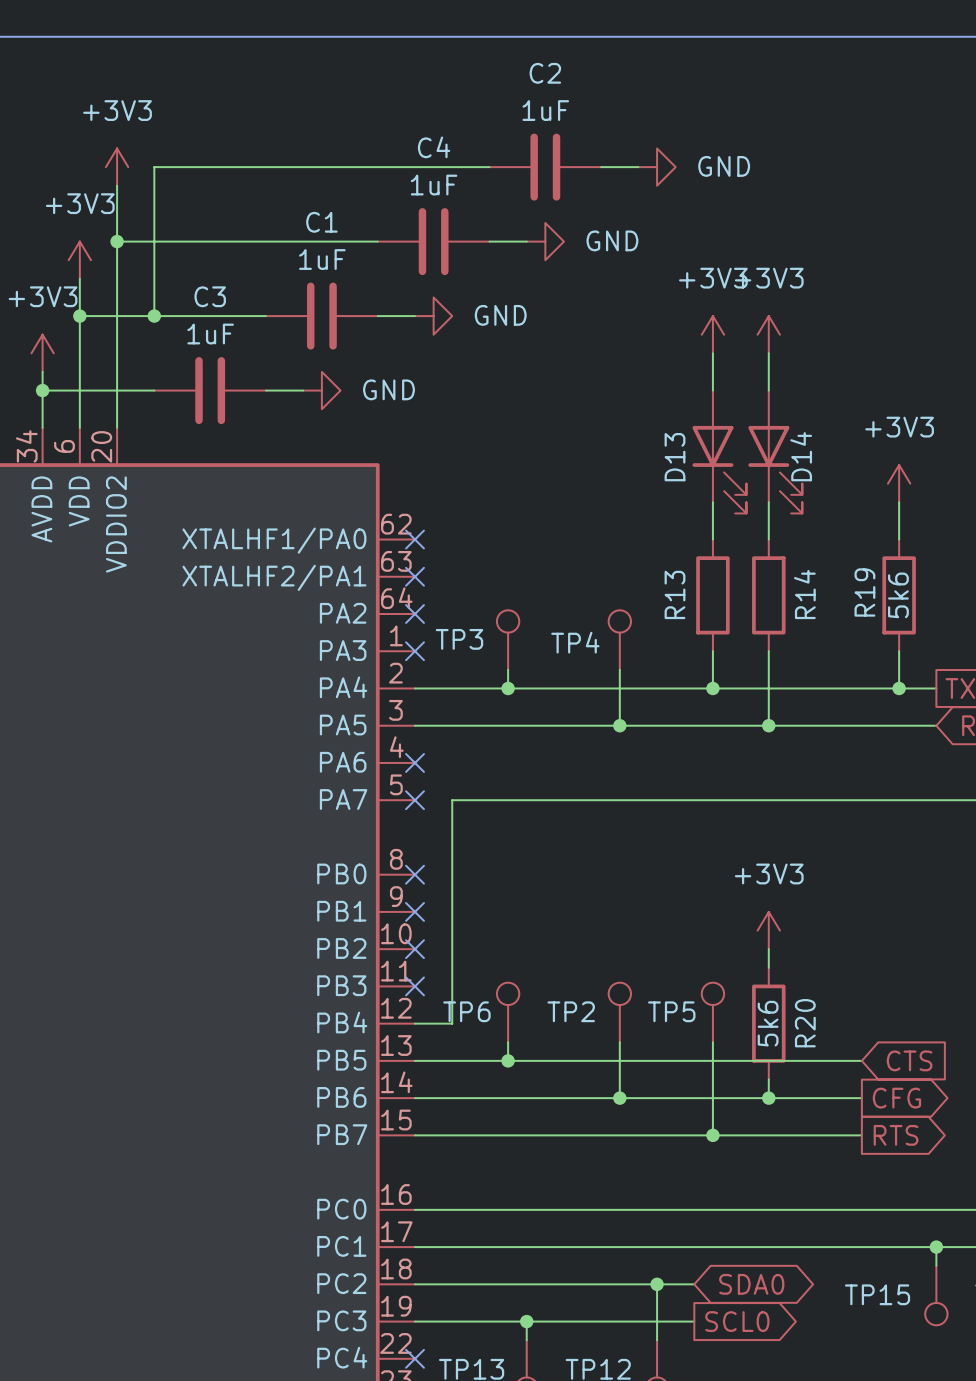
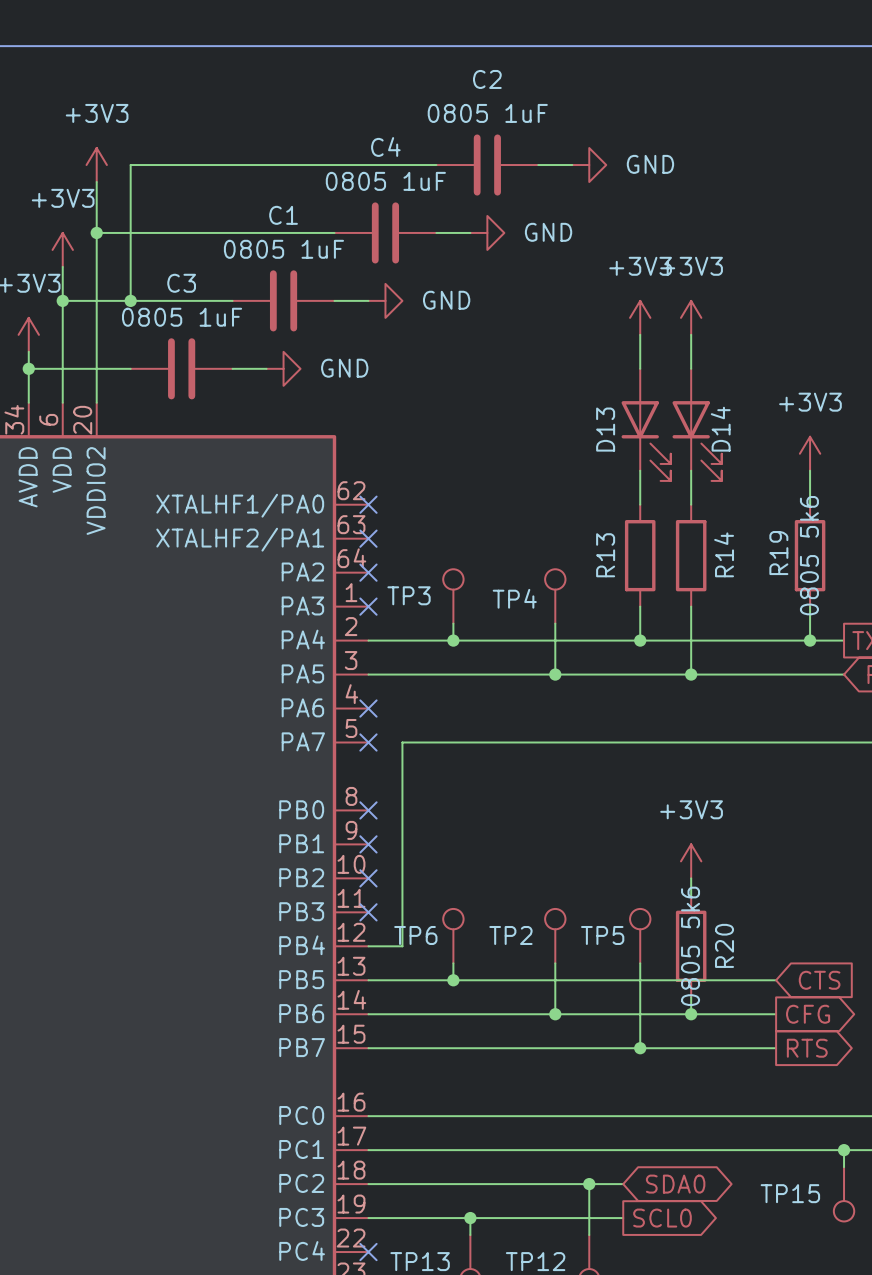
C2 value: 1uF (545, 110) -> 0805 1uF (487, 113)
C4 value: 1uF (434, 185) -> 0805 1uF (385, 181)
C1 value: 1uF (322, 259) -> 0805 1uF (283, 249)
C3 value: 1uF (210, 334) -> 0805 1uF (182, 317)
R19 value: 5k6 (898, 595) -> 0805 5k6 (809, 555)
R20 value: 5k6 (768, 1023) -> 0805 5k6 (690, 946)

